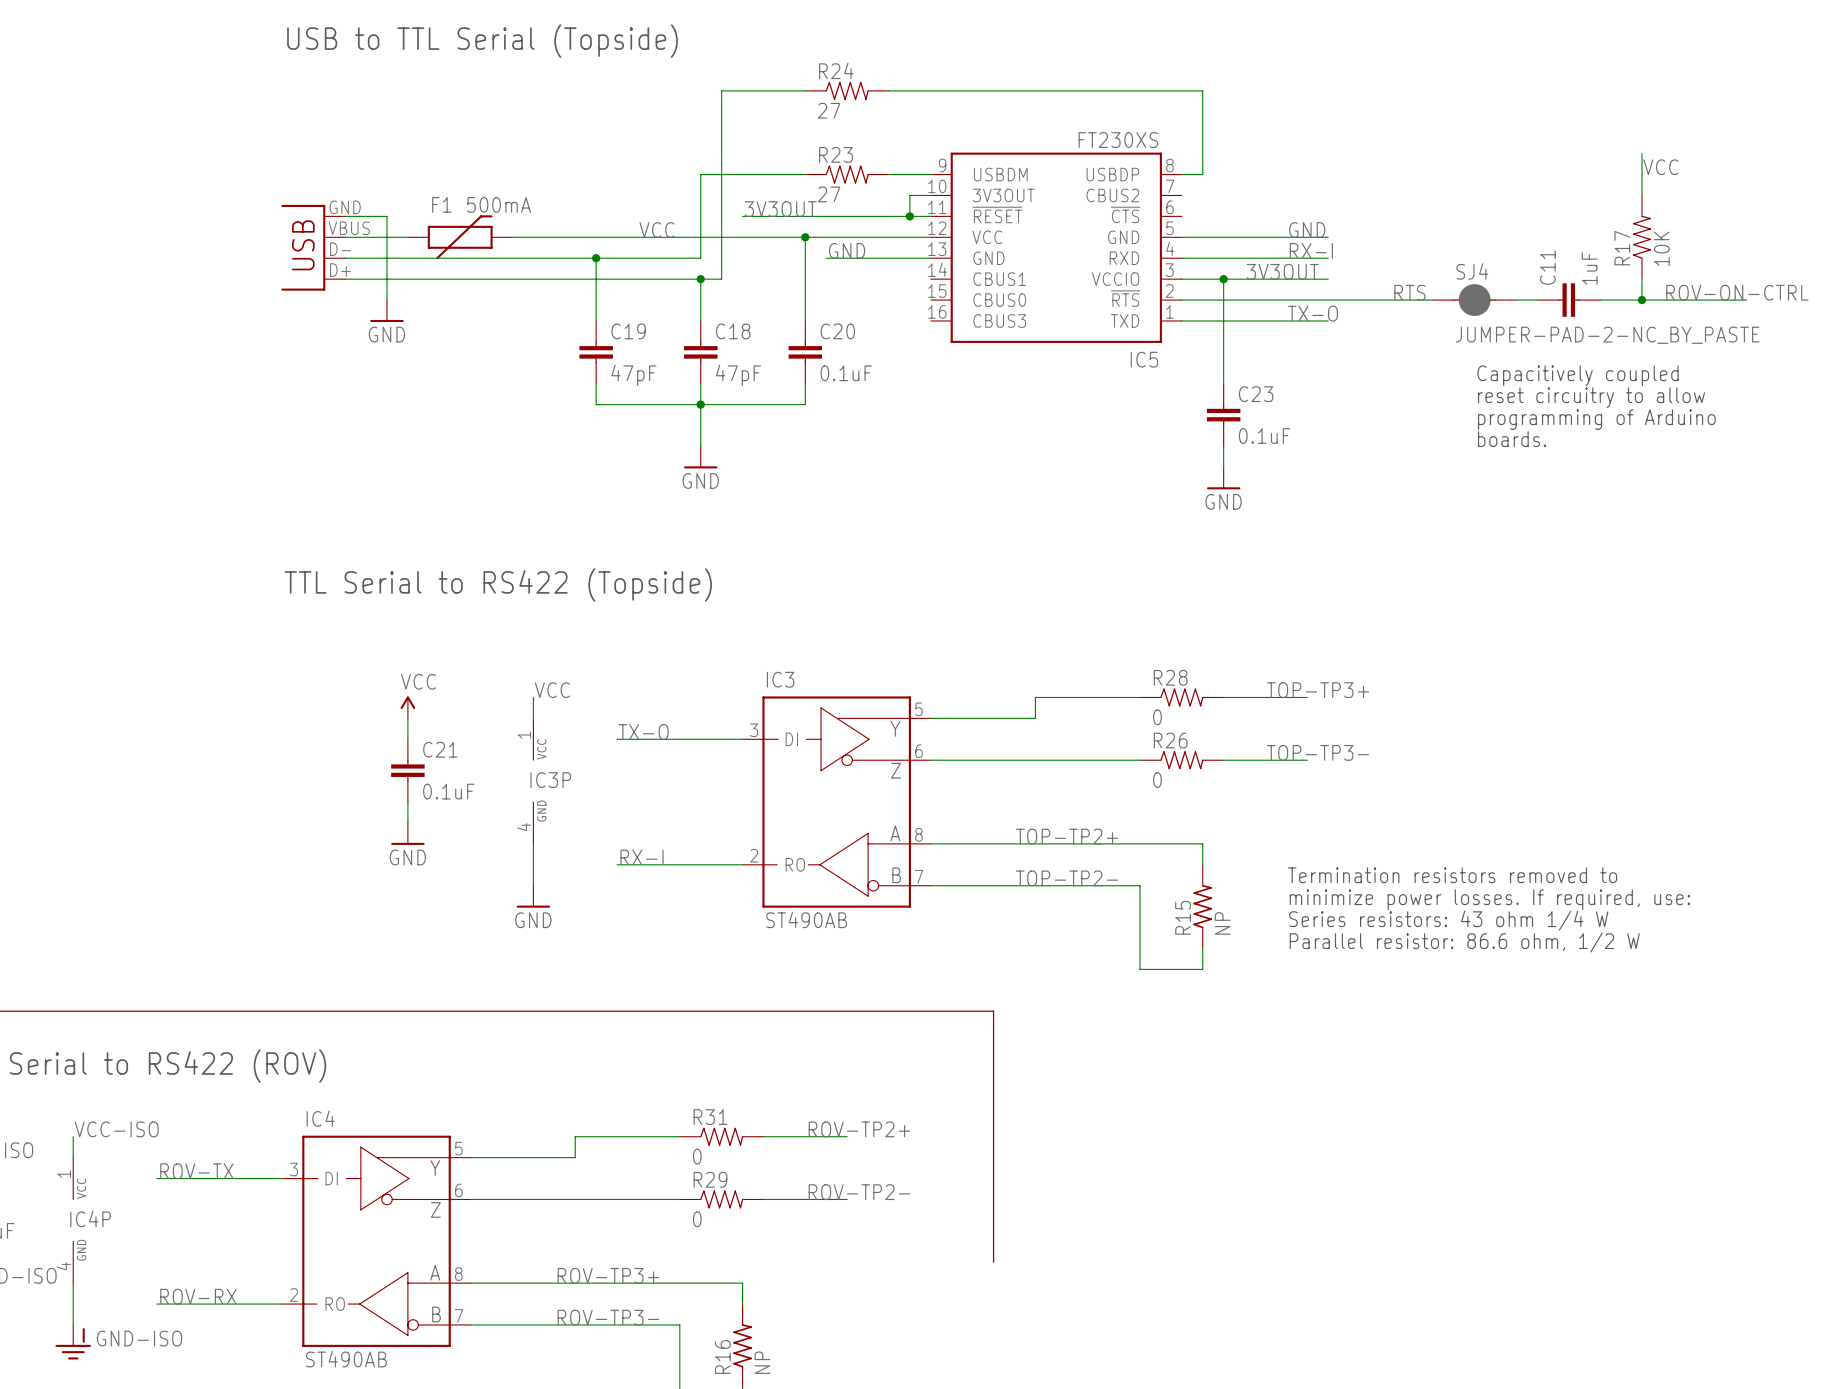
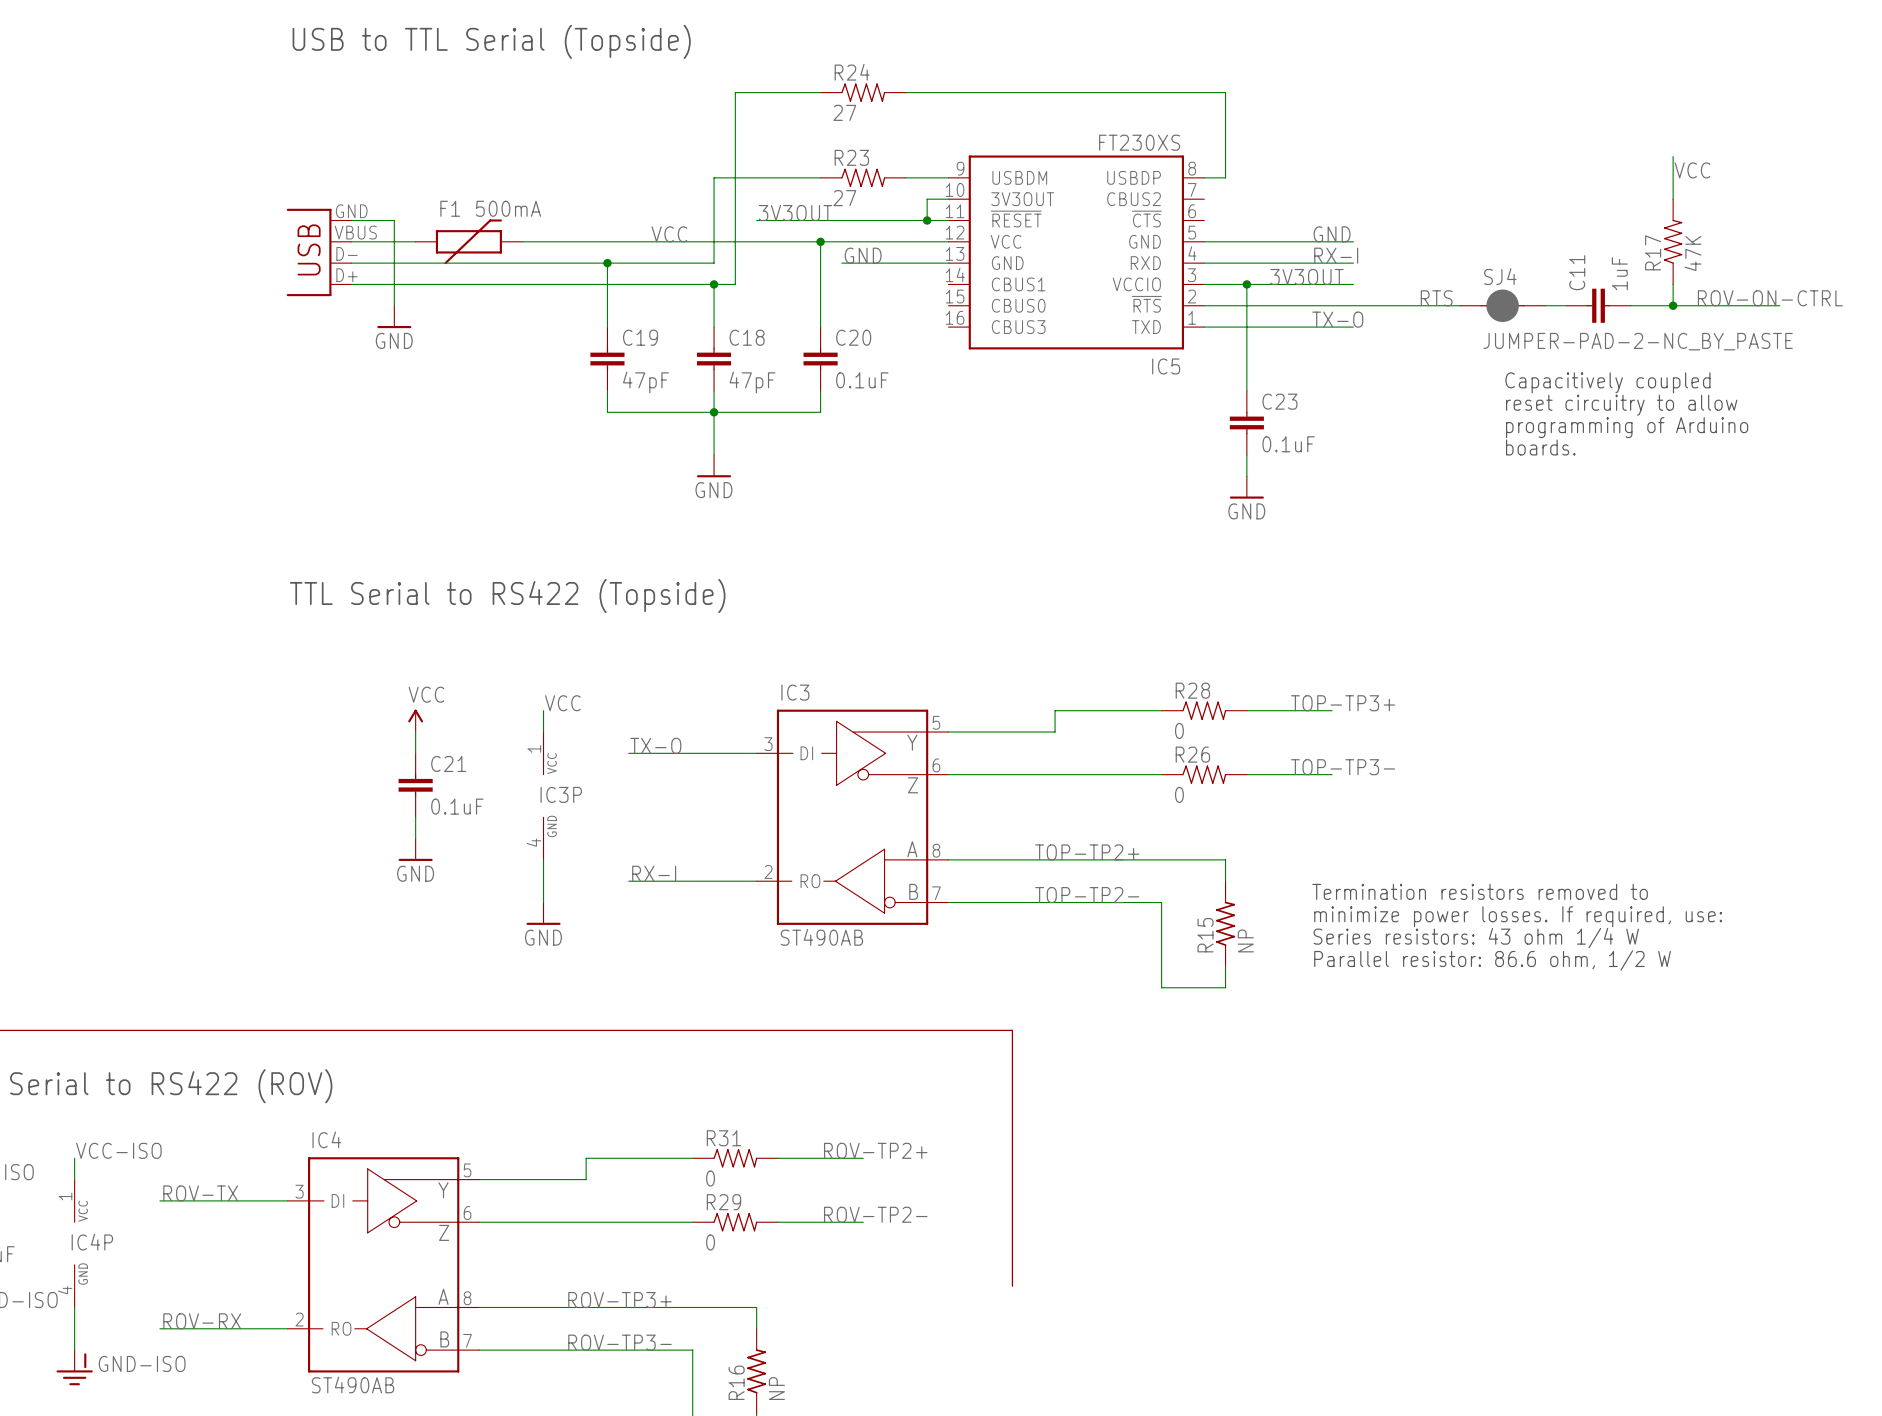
R17 value: 10K (1661, 248) -> 47K (1693, 253)

